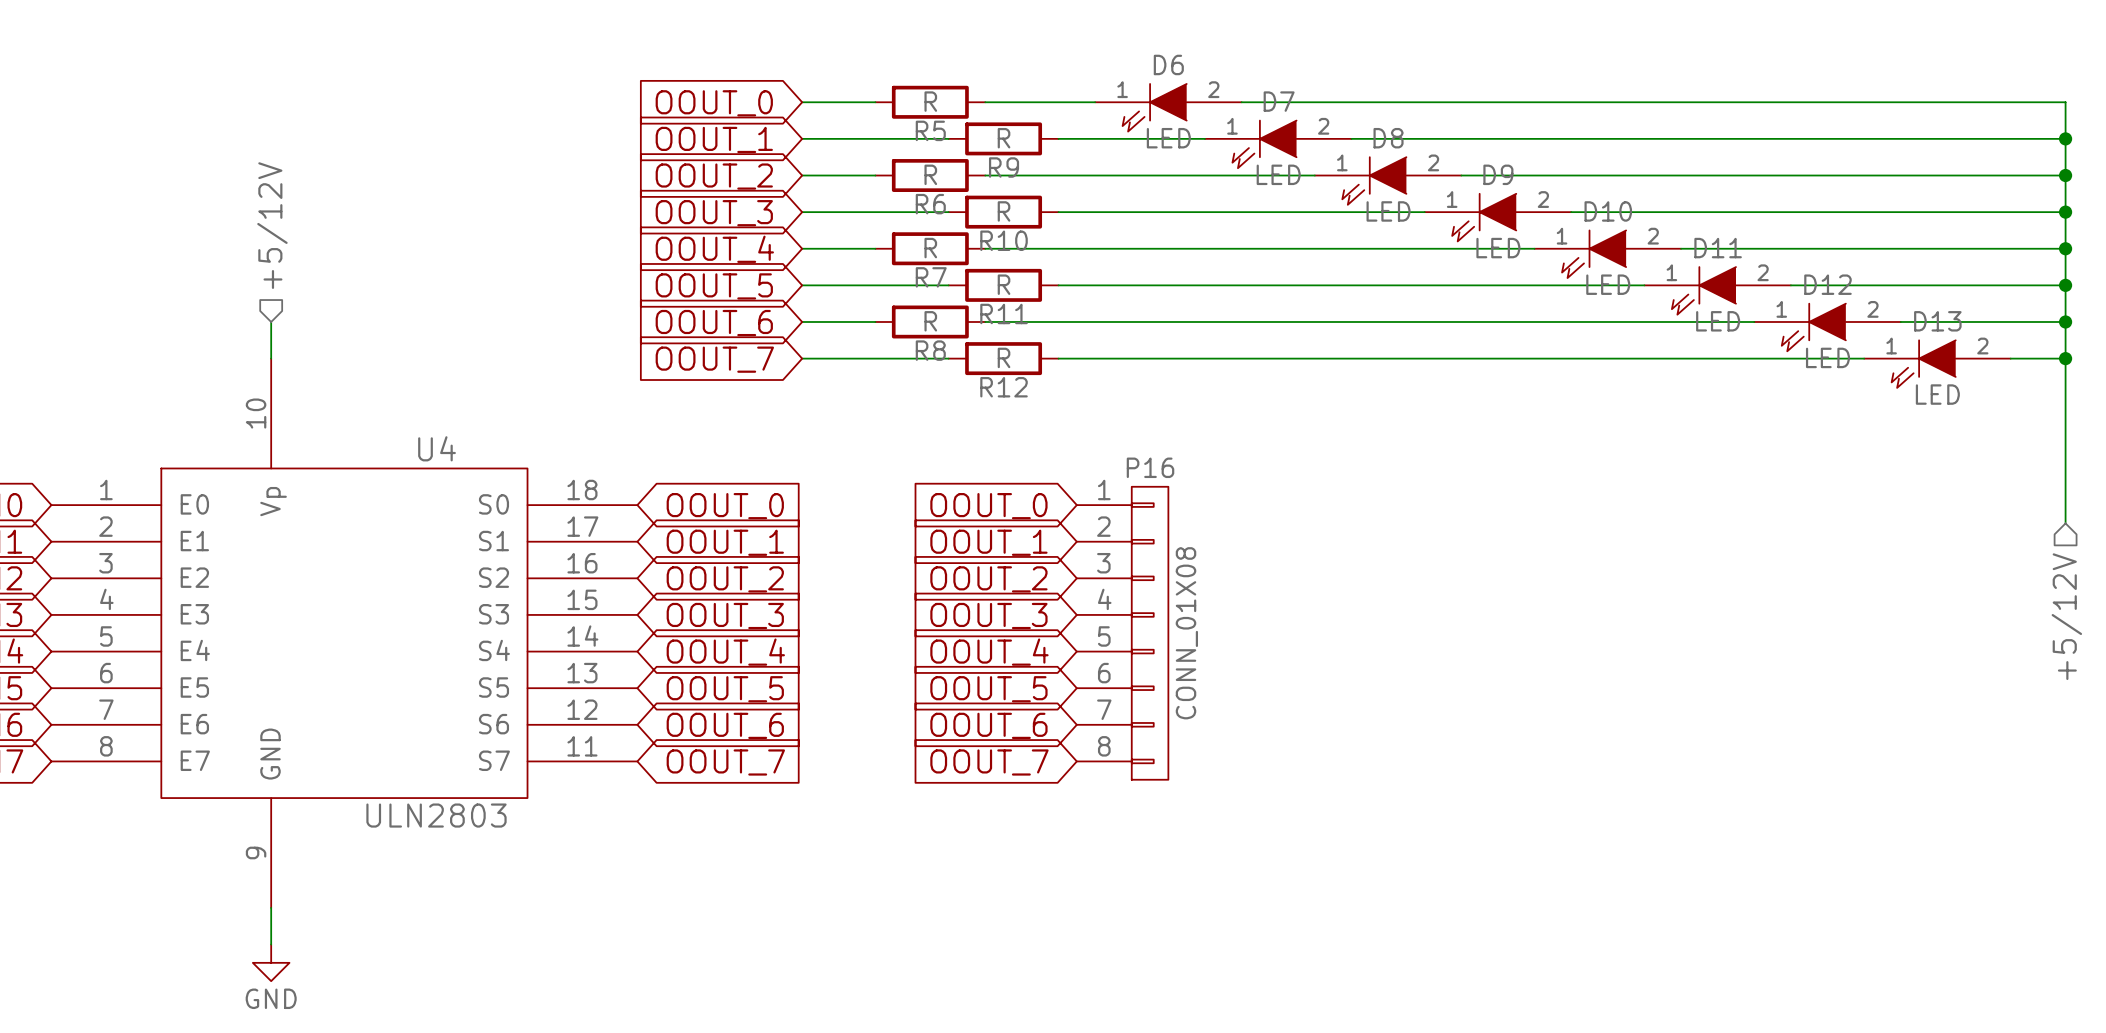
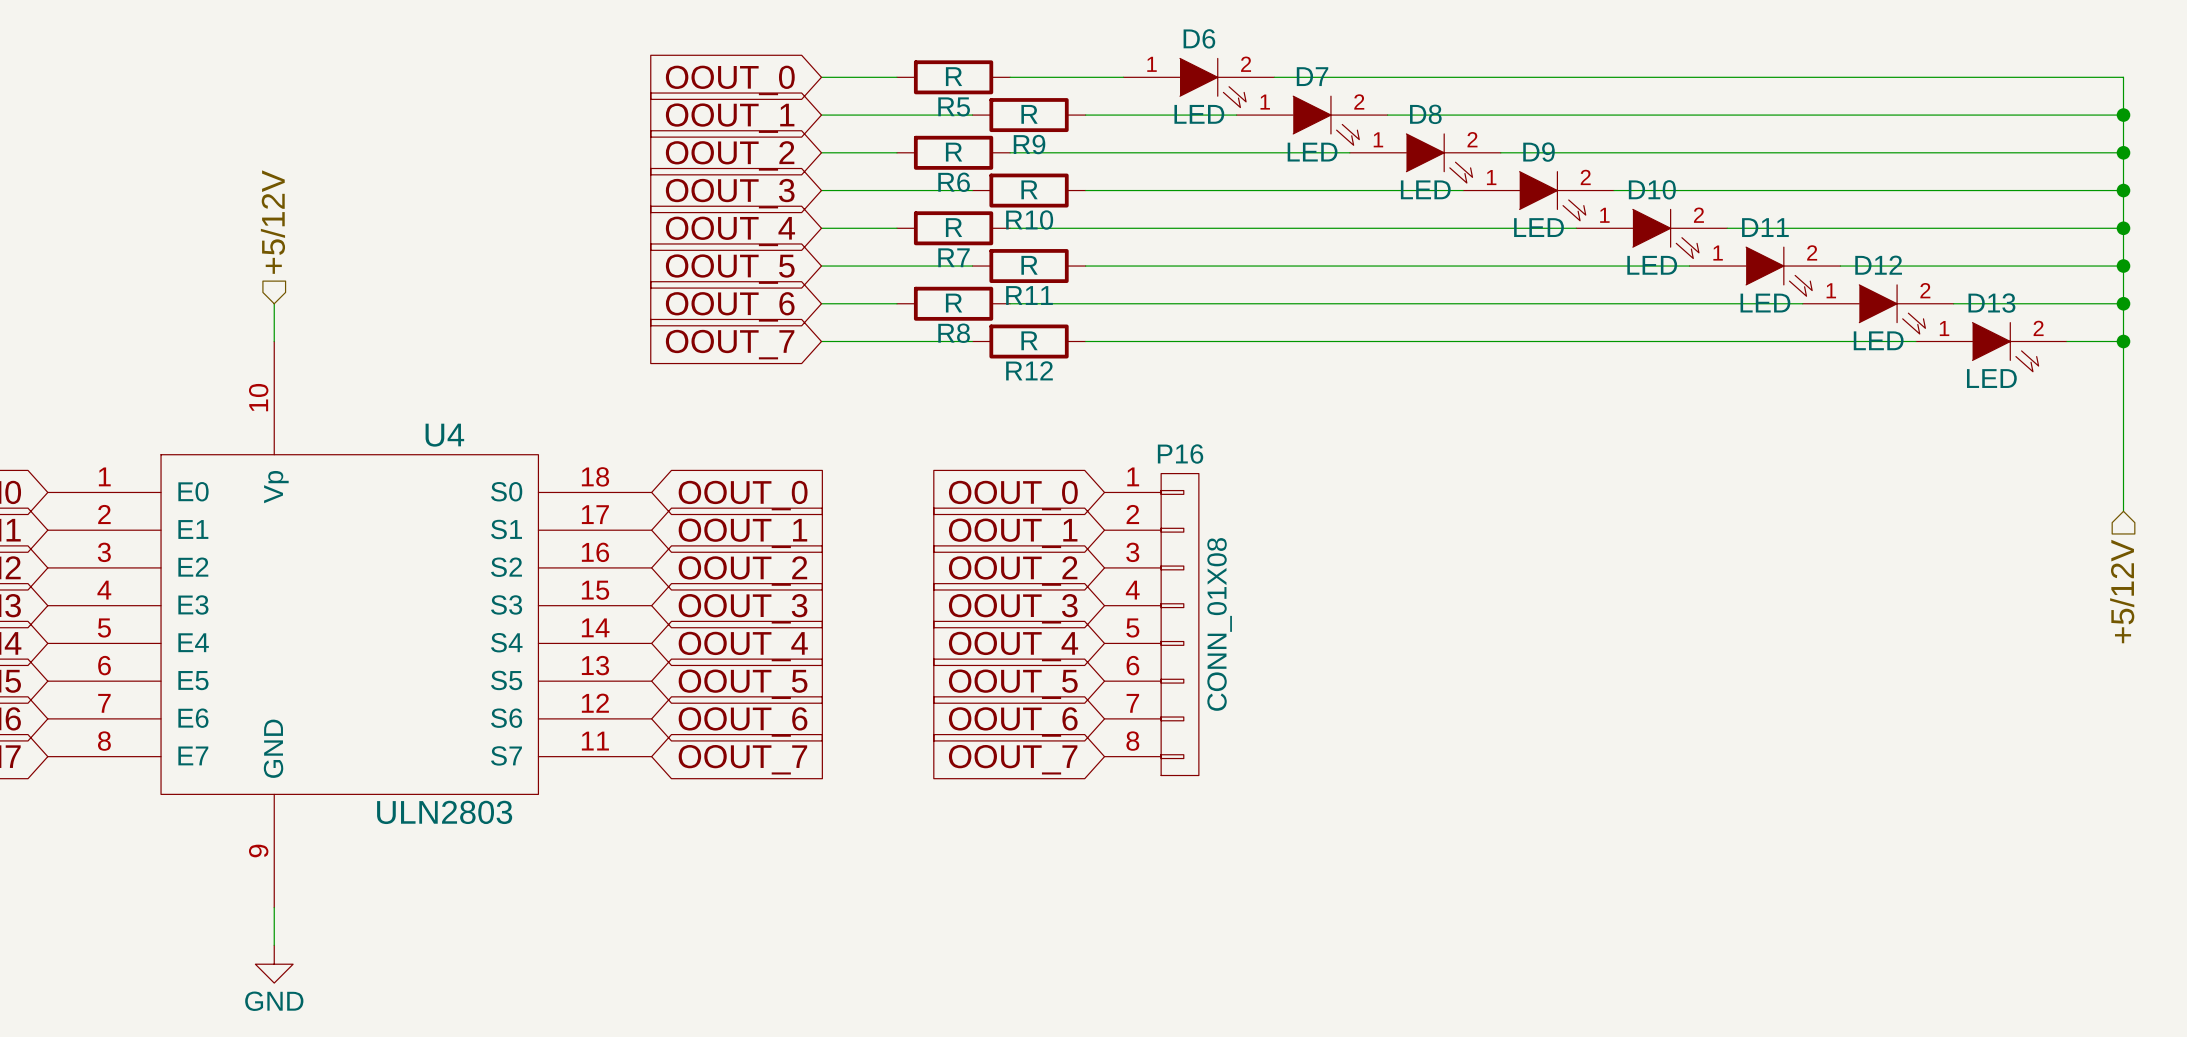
D6 symbol: [1095, 83, 1242, 132] -> [1123, 58, 1275, 108]
D7 symbol: [1205, 120, 1352, 169] -> [1236, 96, 1388, 146]
D8 symbol: [1314, 157, 1462, 205] -> [1349, 133, 1501, 183]
D9 symbol: [1424, 193, 1572, 242] -> [1463, 171, 1615, 221]
D10 symbol: [1534, 230, 1682, 279] -> [1576, 209, 1728, 259]
D11 symbol: [1644, 267, 1791, 315] -> [1689, 247, 1841, 297]
D12 symbol: [1754, 303, 1901, 352] -> [1802, 284, 1954, 334]
D13 symbol: [1864, 340, 2011, 388] -> [1915, 322, 2067, 372]

